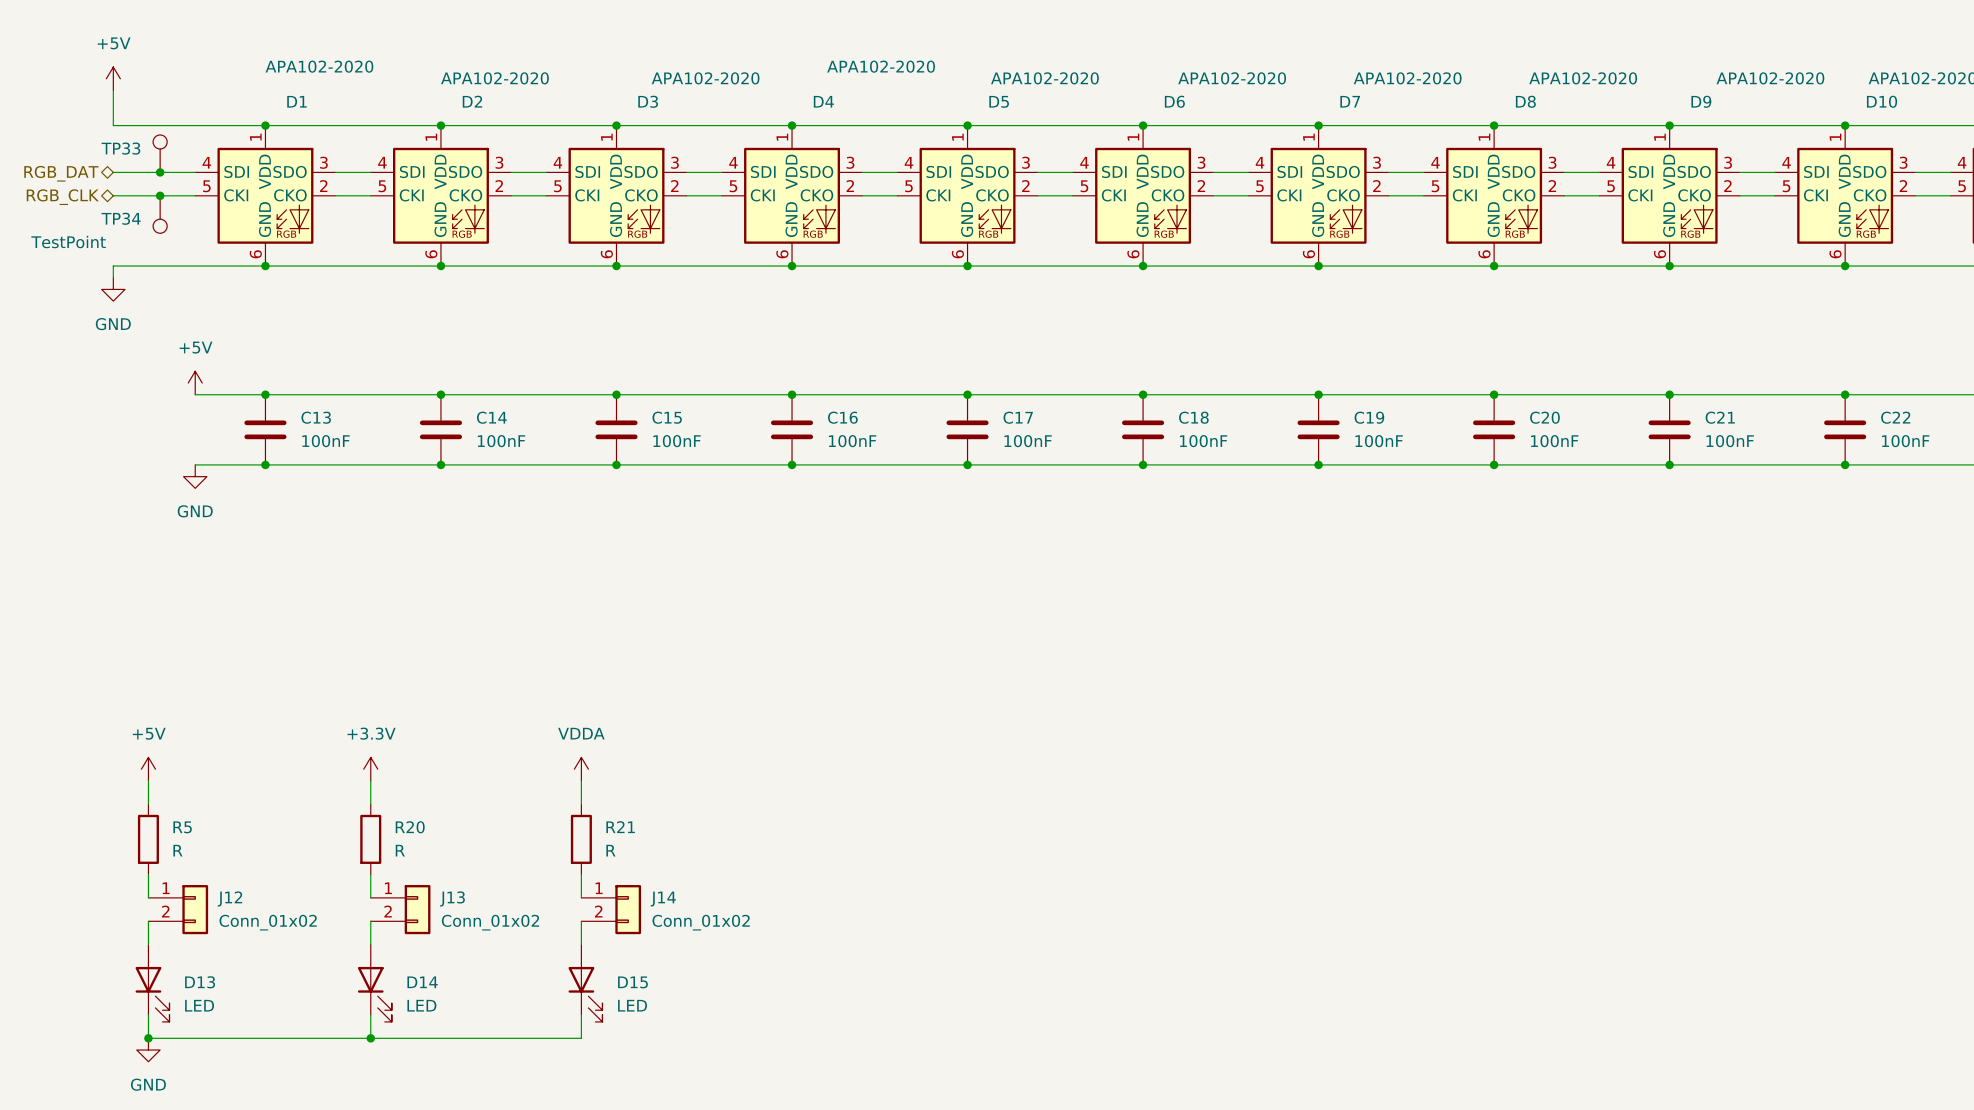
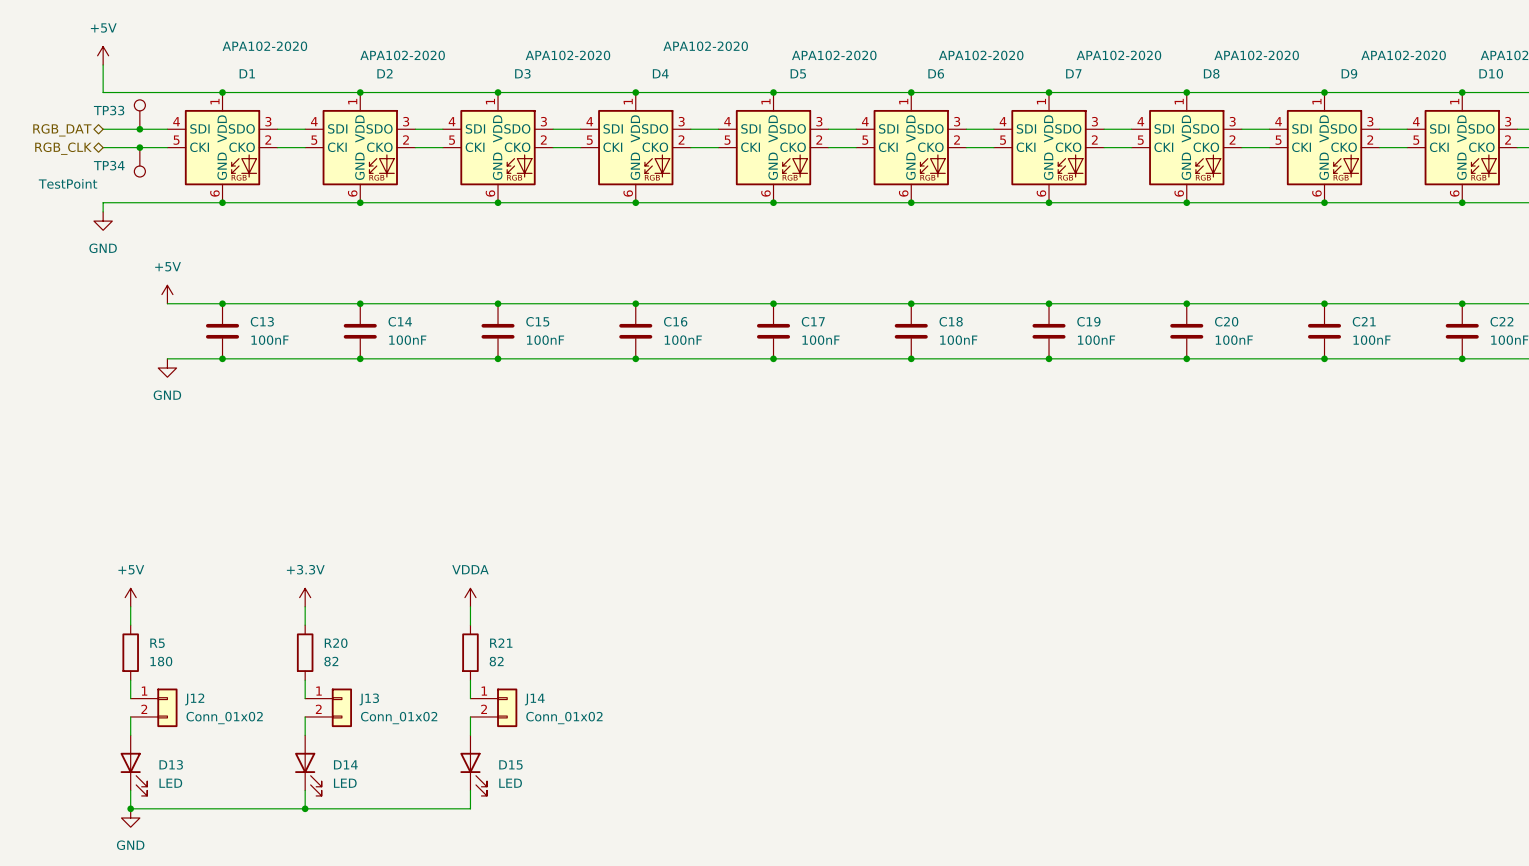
R5 value: R (177, 850) -> 180 (161, 661)
R20 value: R (400, 850) -> 82 (331, 661)
R21 value: R (610, 850) -> 82 (496, 661)

